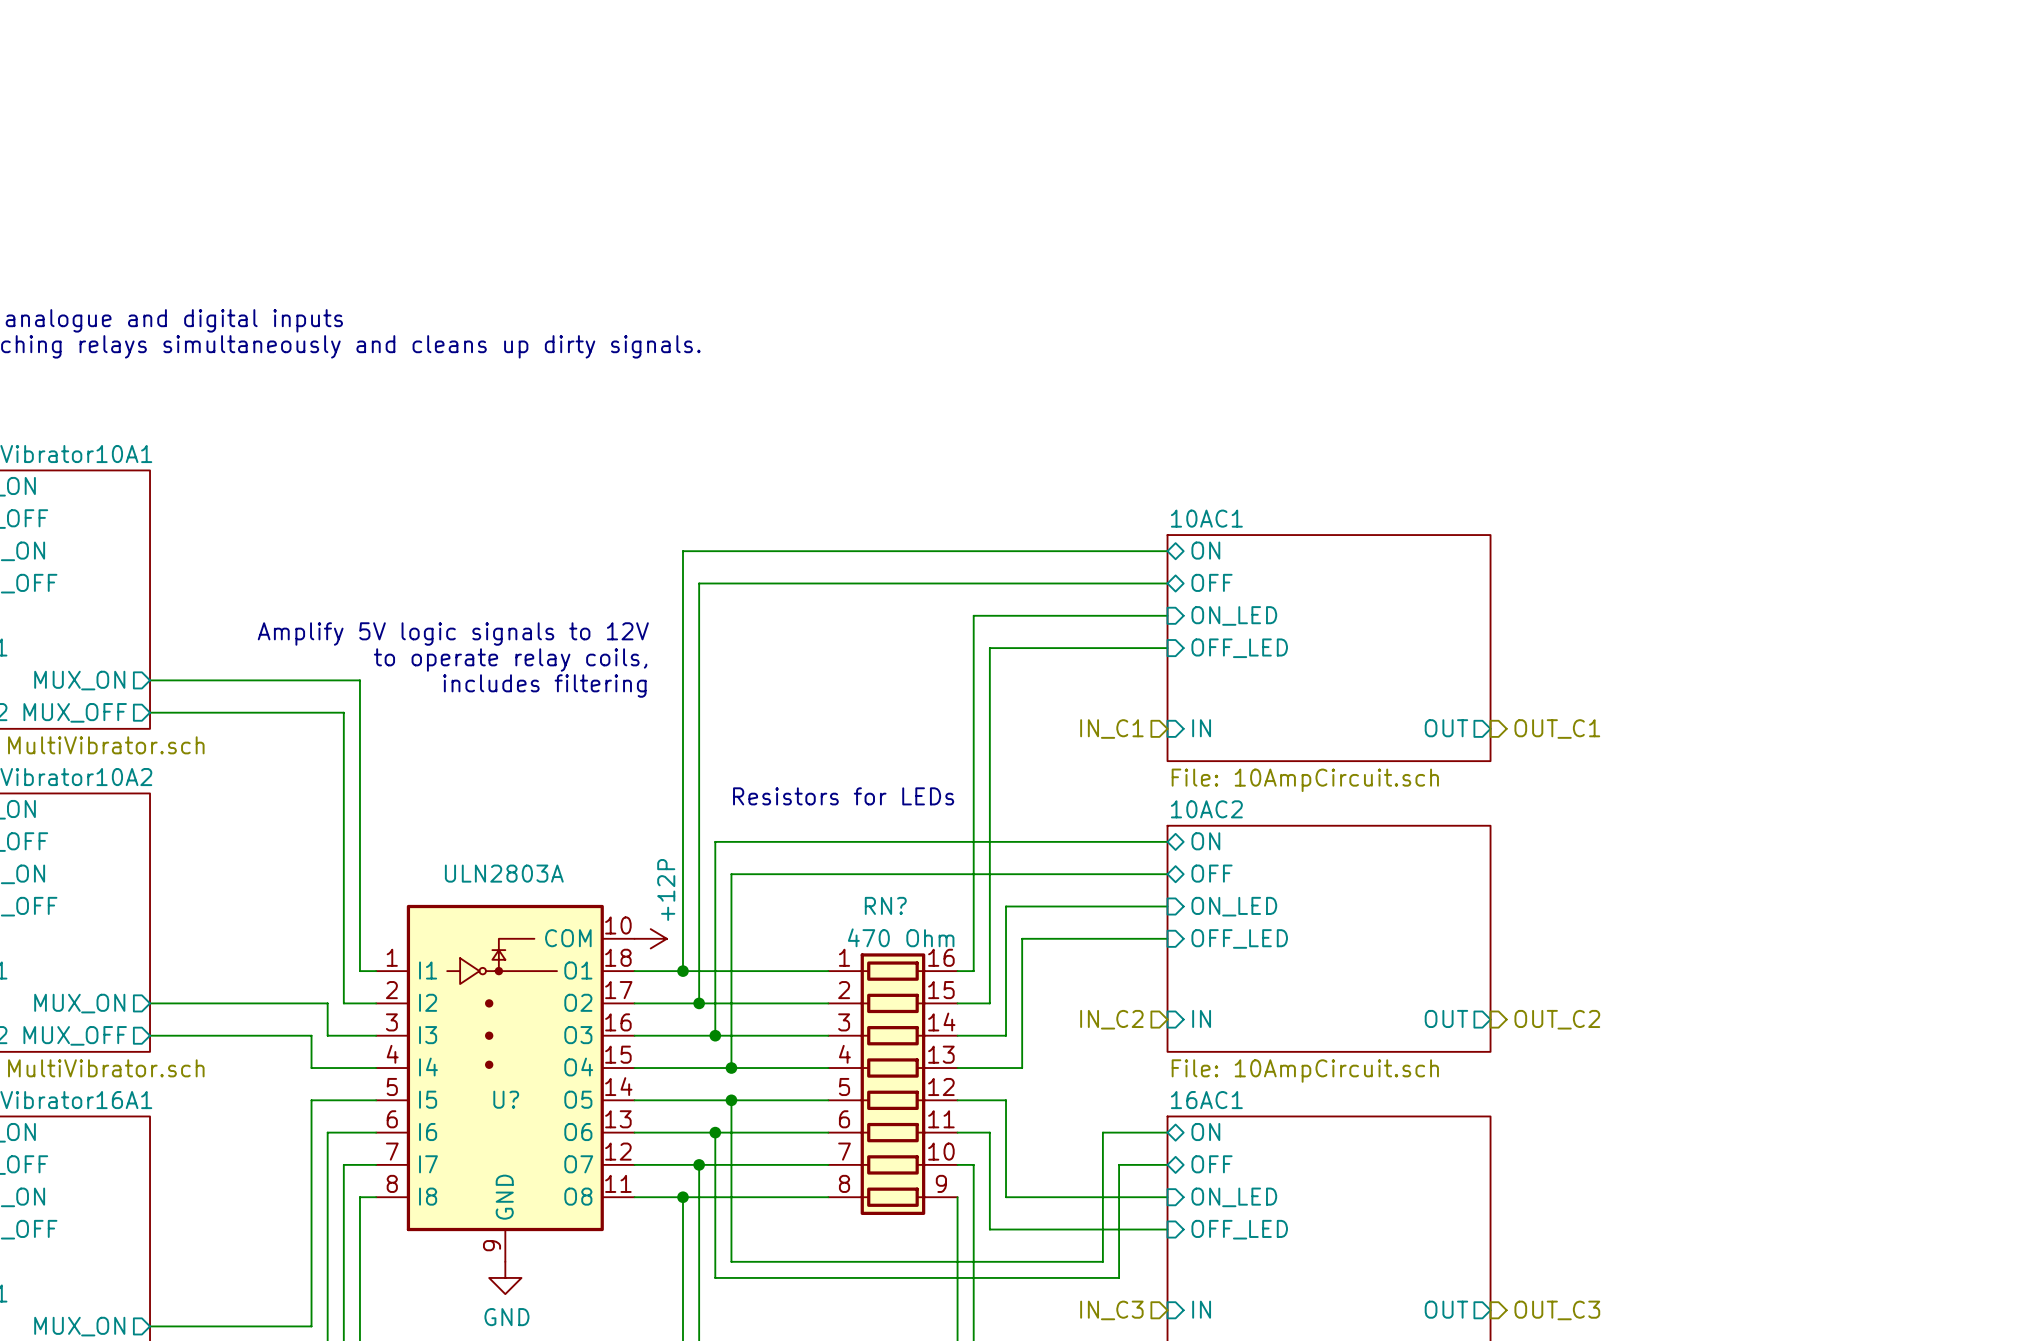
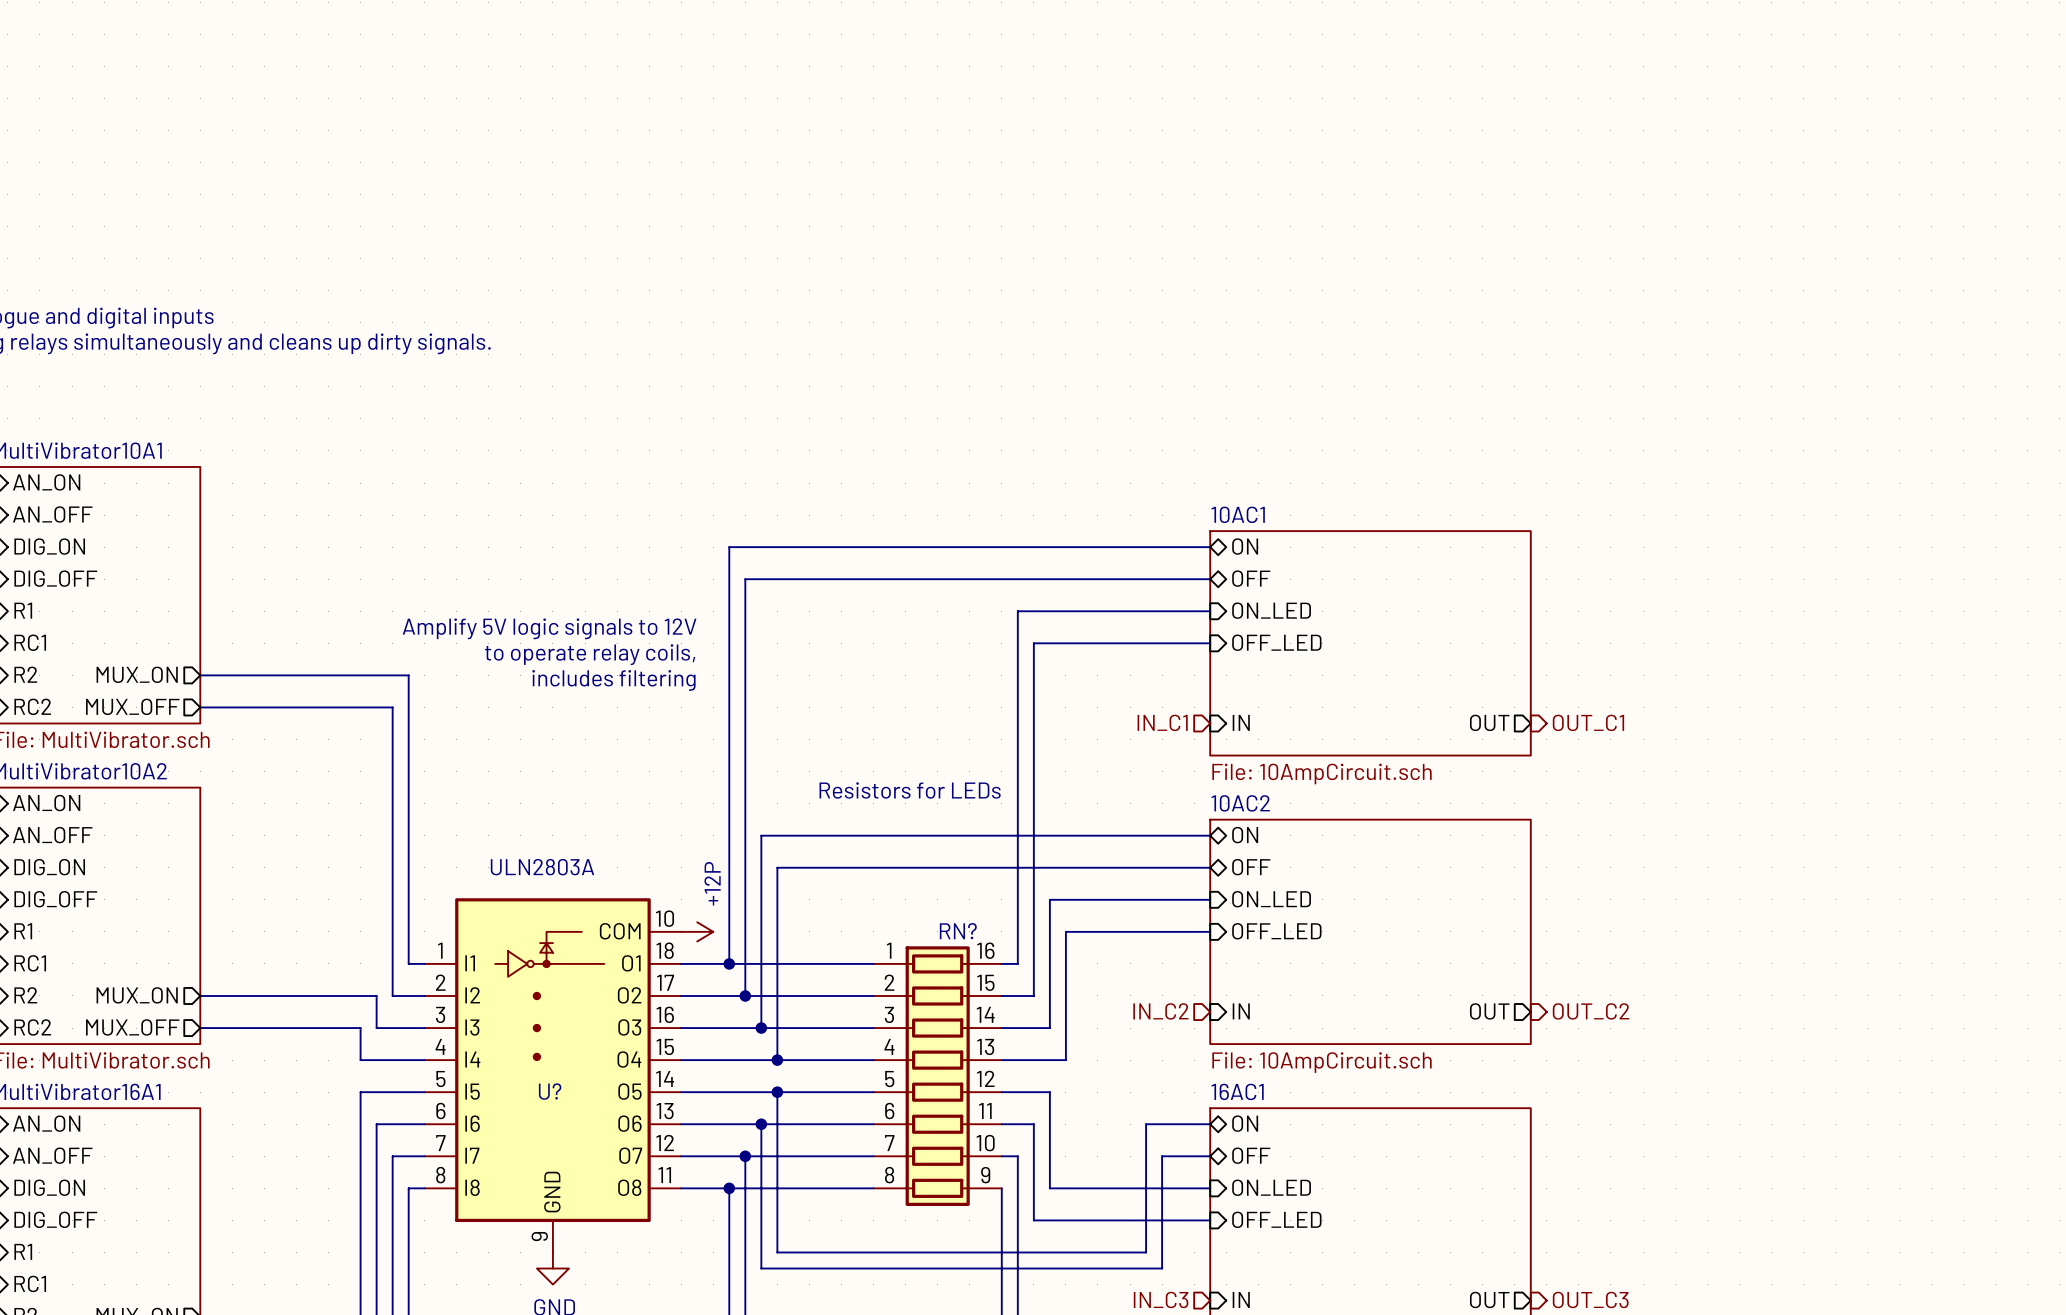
RN? name position: RN? (885, 905) -> RN? (958, 931)
RN? value: 470 Ohm (901, 937) -> none

